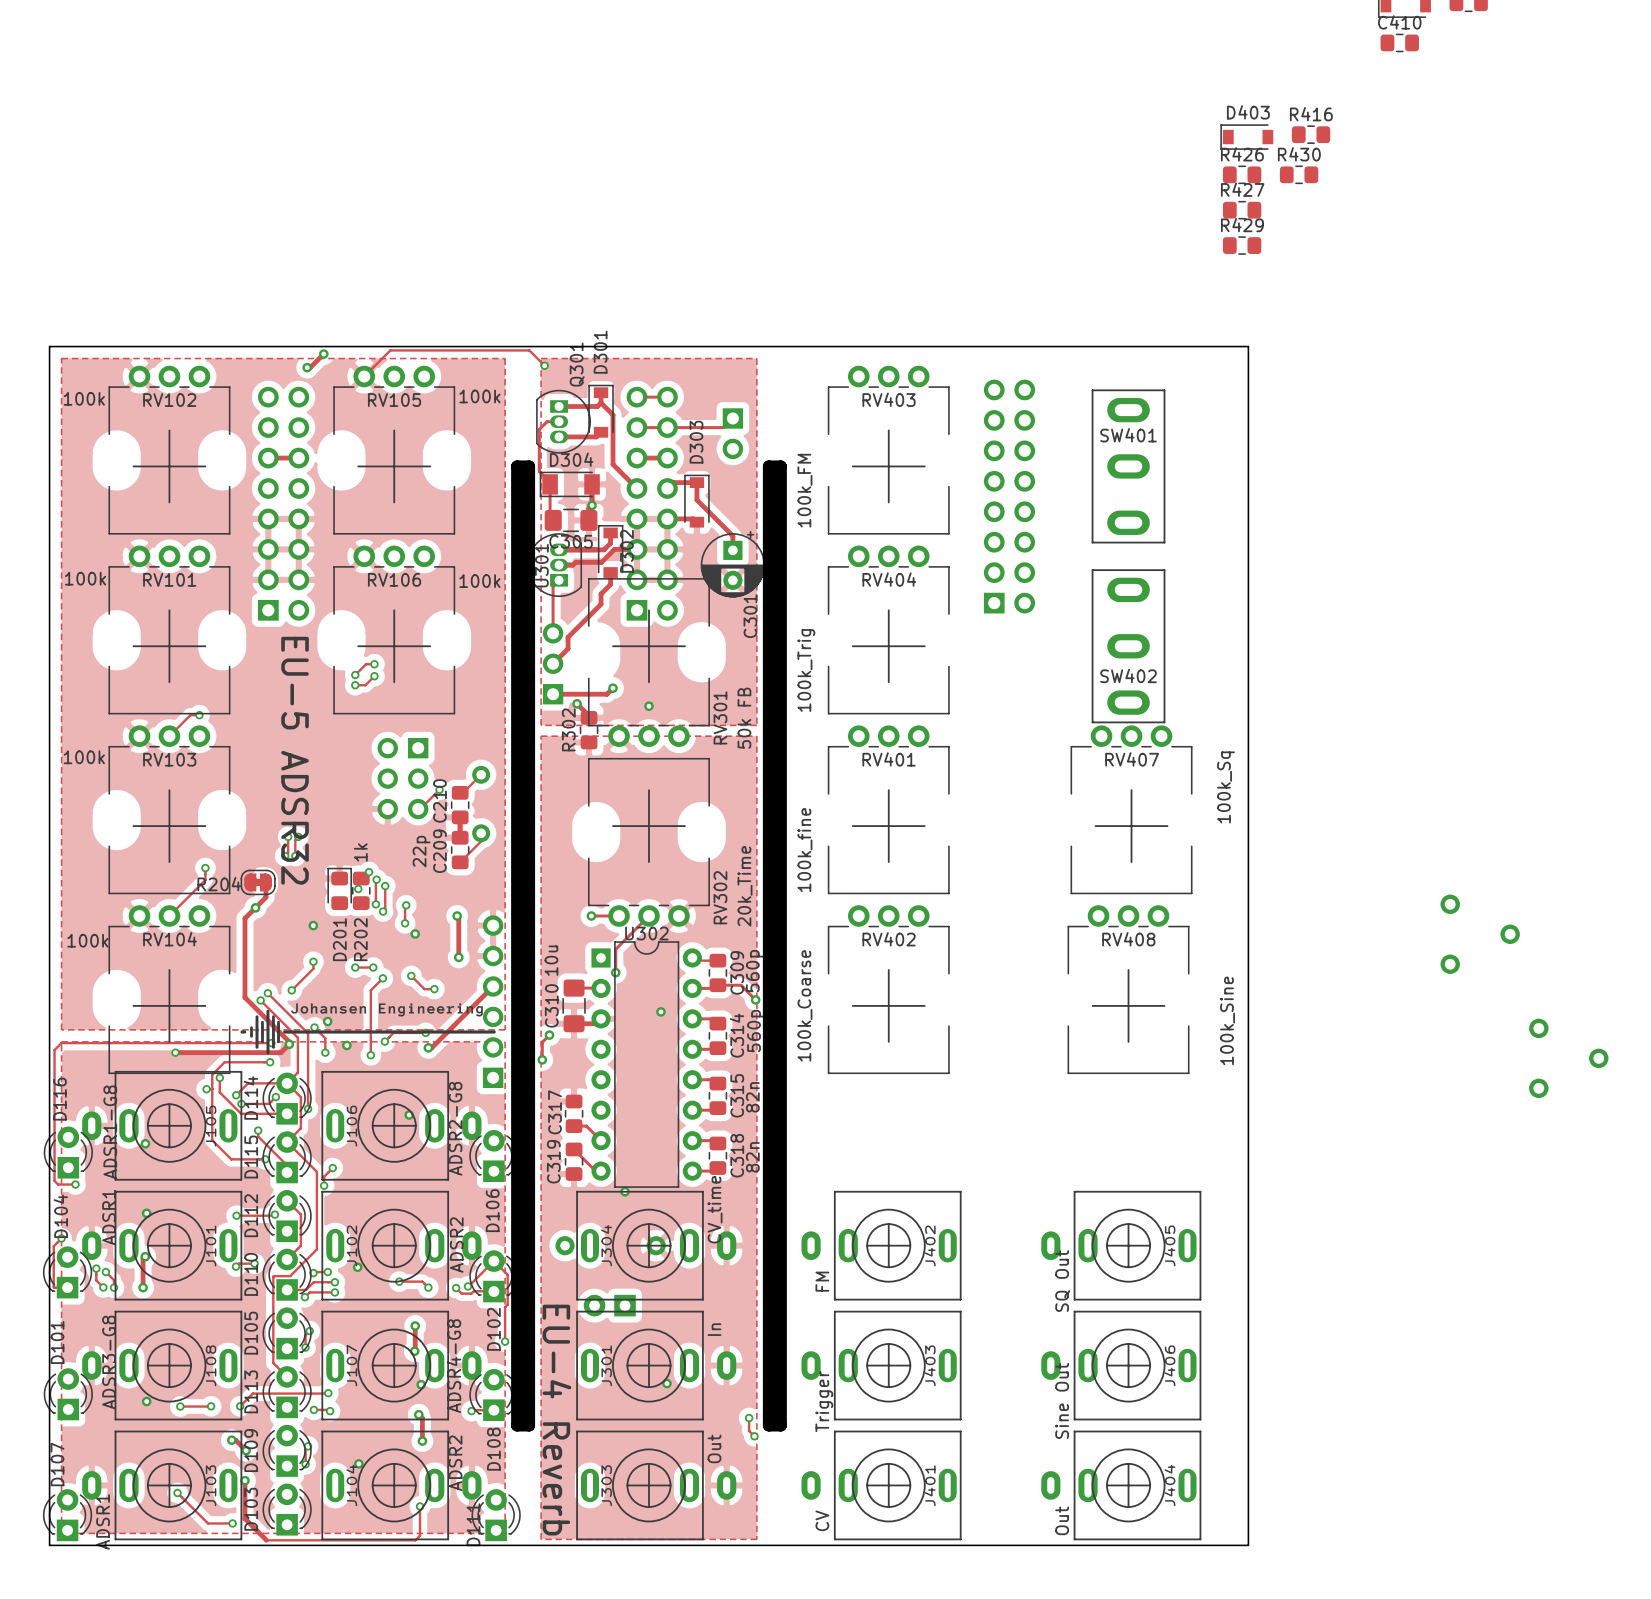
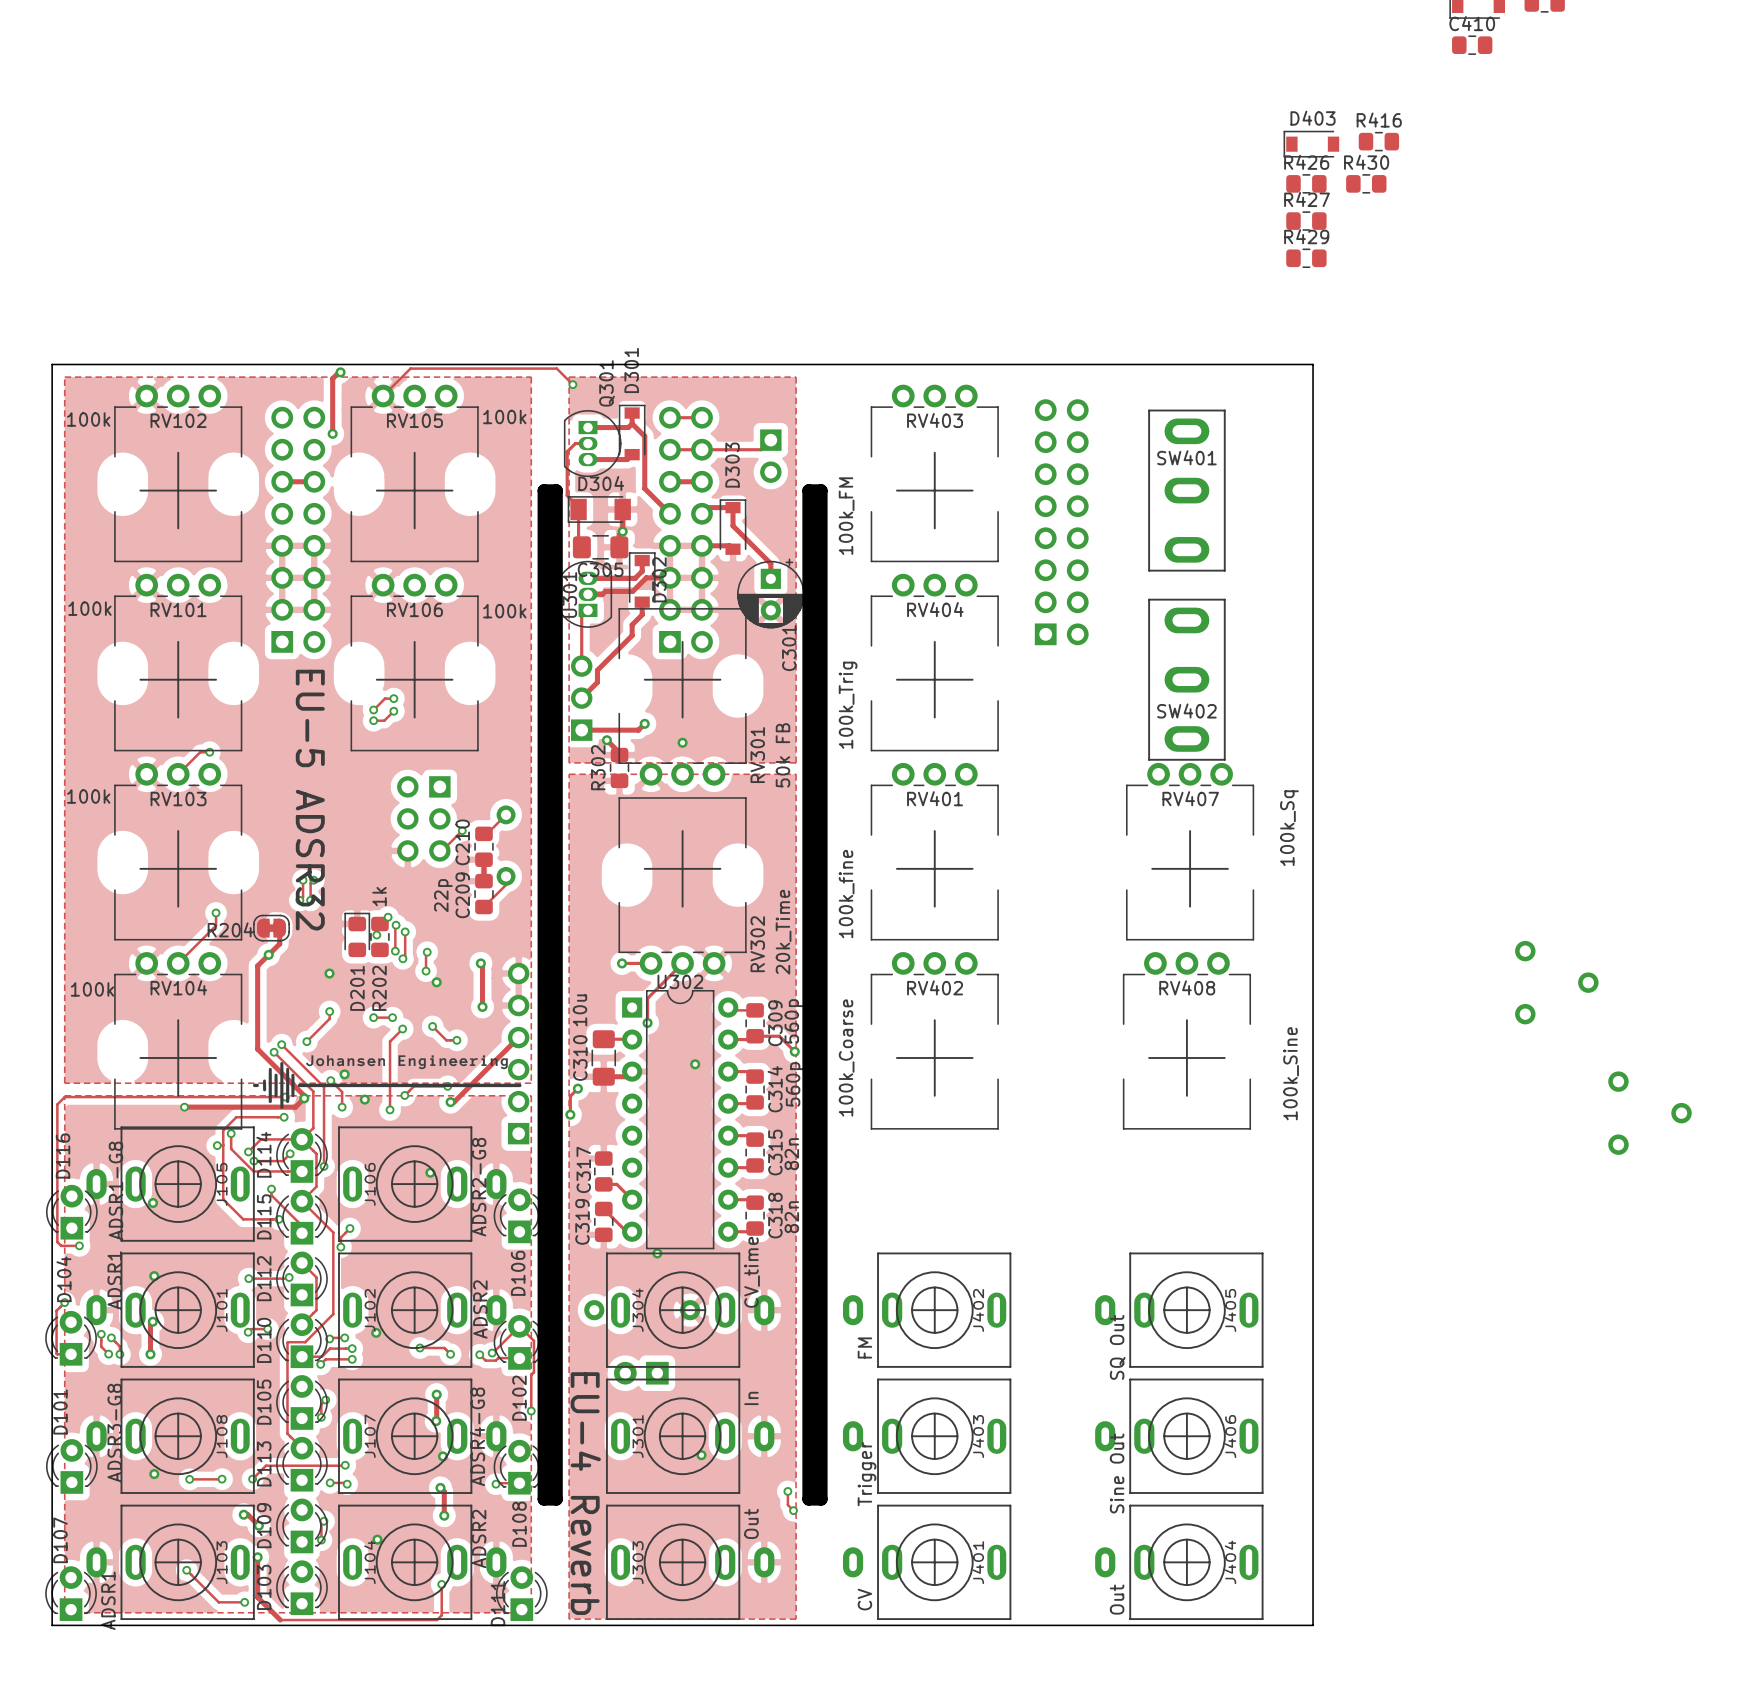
track: none -> (338, 372) (332, 378) (332, 433)
track: (323, 354) (310, 367) (307, 367) -> none
via position: (307, 367) -> (332, 433)

